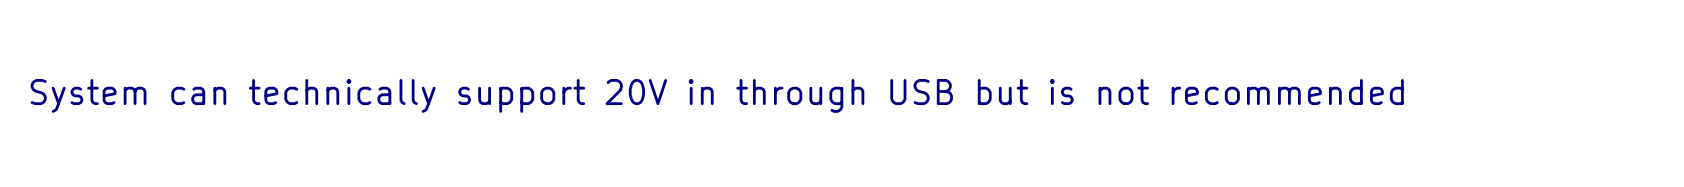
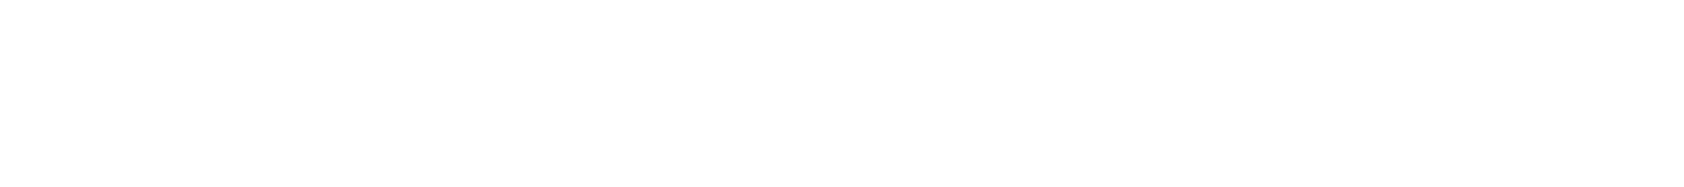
text: System can technically support 20V in through USB but is not recommended (717, 95) -> none

